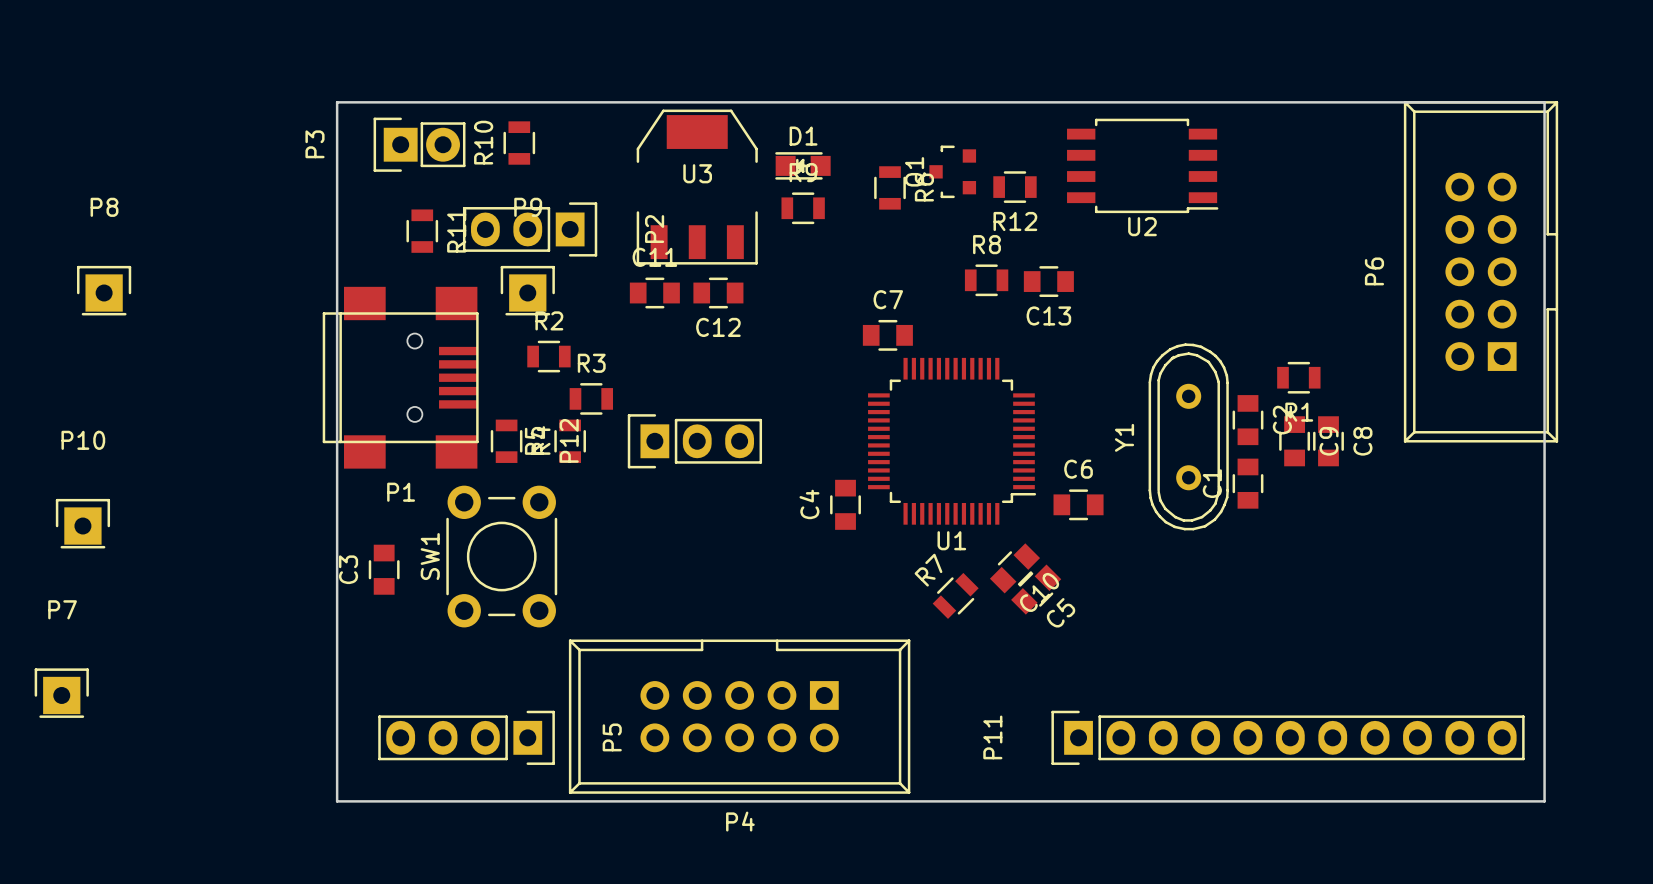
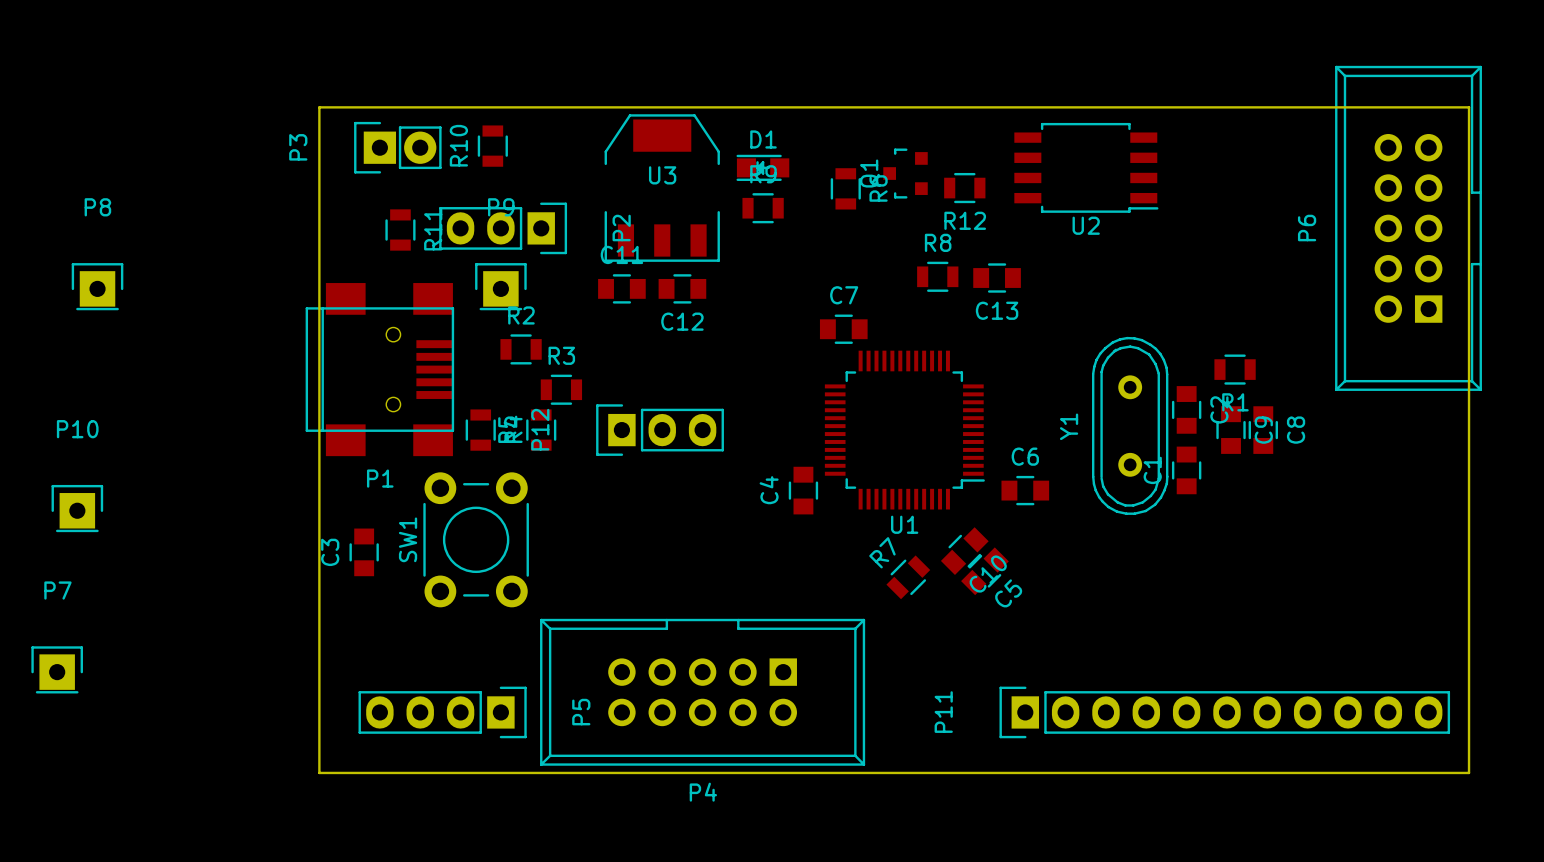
P6 position: (1481, 271) -> (1408, 228)

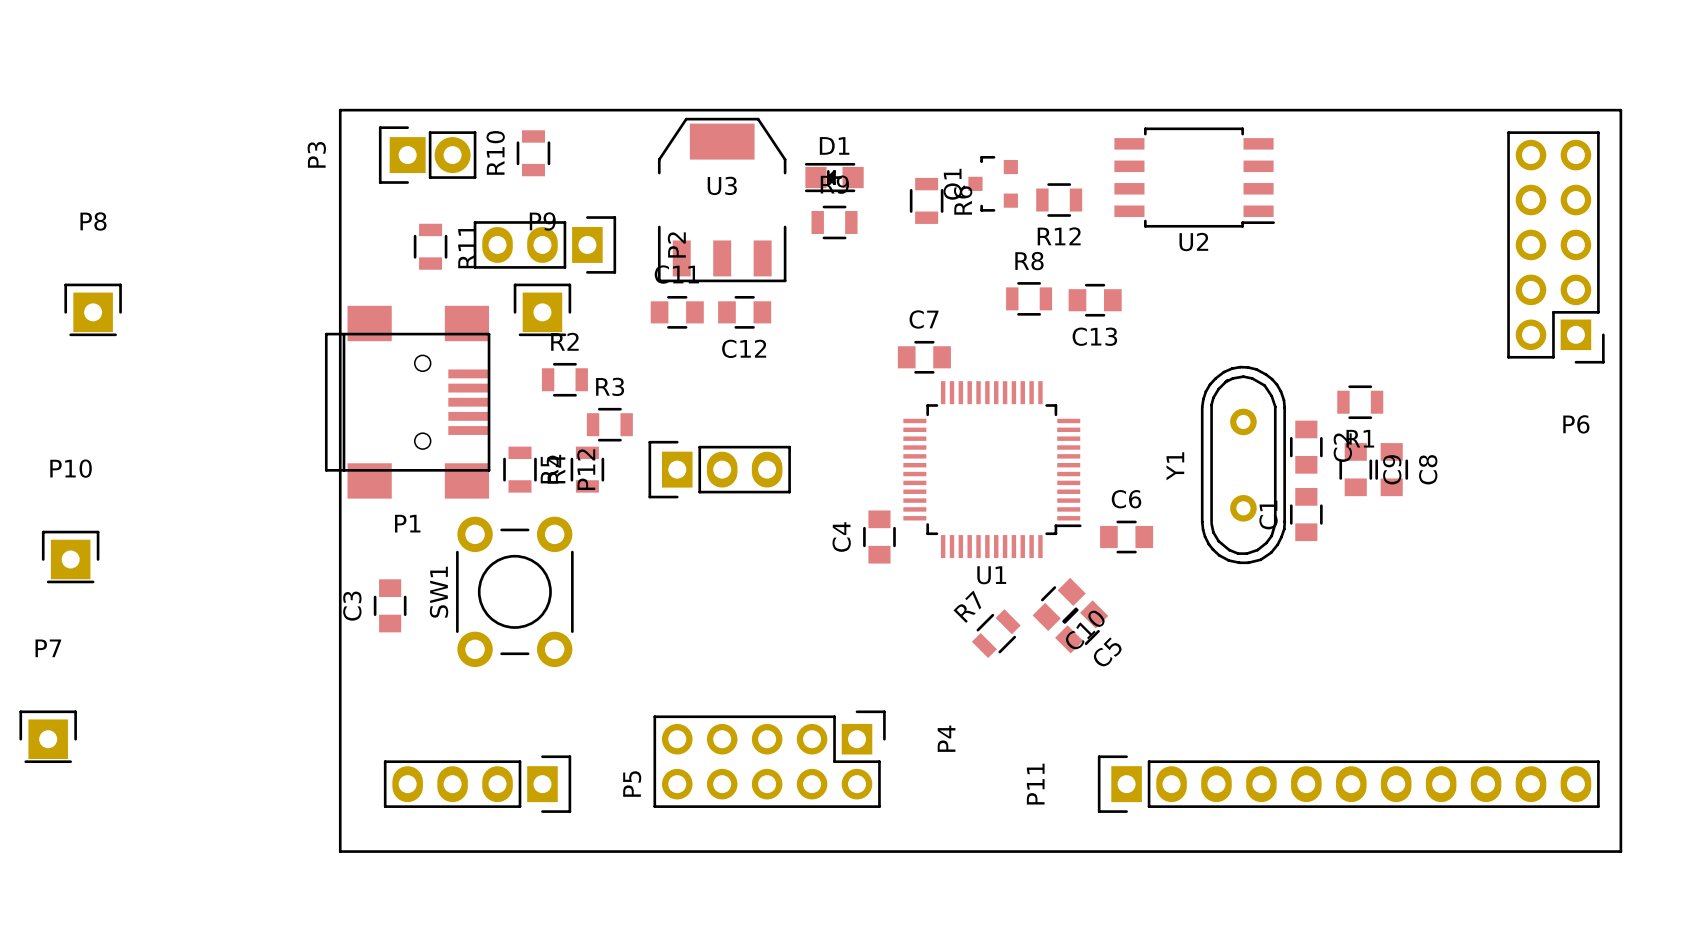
P6 footprint: [1335, 65, 1482, 391] -> [1507, 131, 1605, 364]
P6 name position: P6 (1307, 228) -> P6 (1576, 424)
P4 footprint: [540, 618, 866, 766] -> [653, 710, 886, 808]
P4 name position: P4 (703, 792) -> P4 (946, 738)

